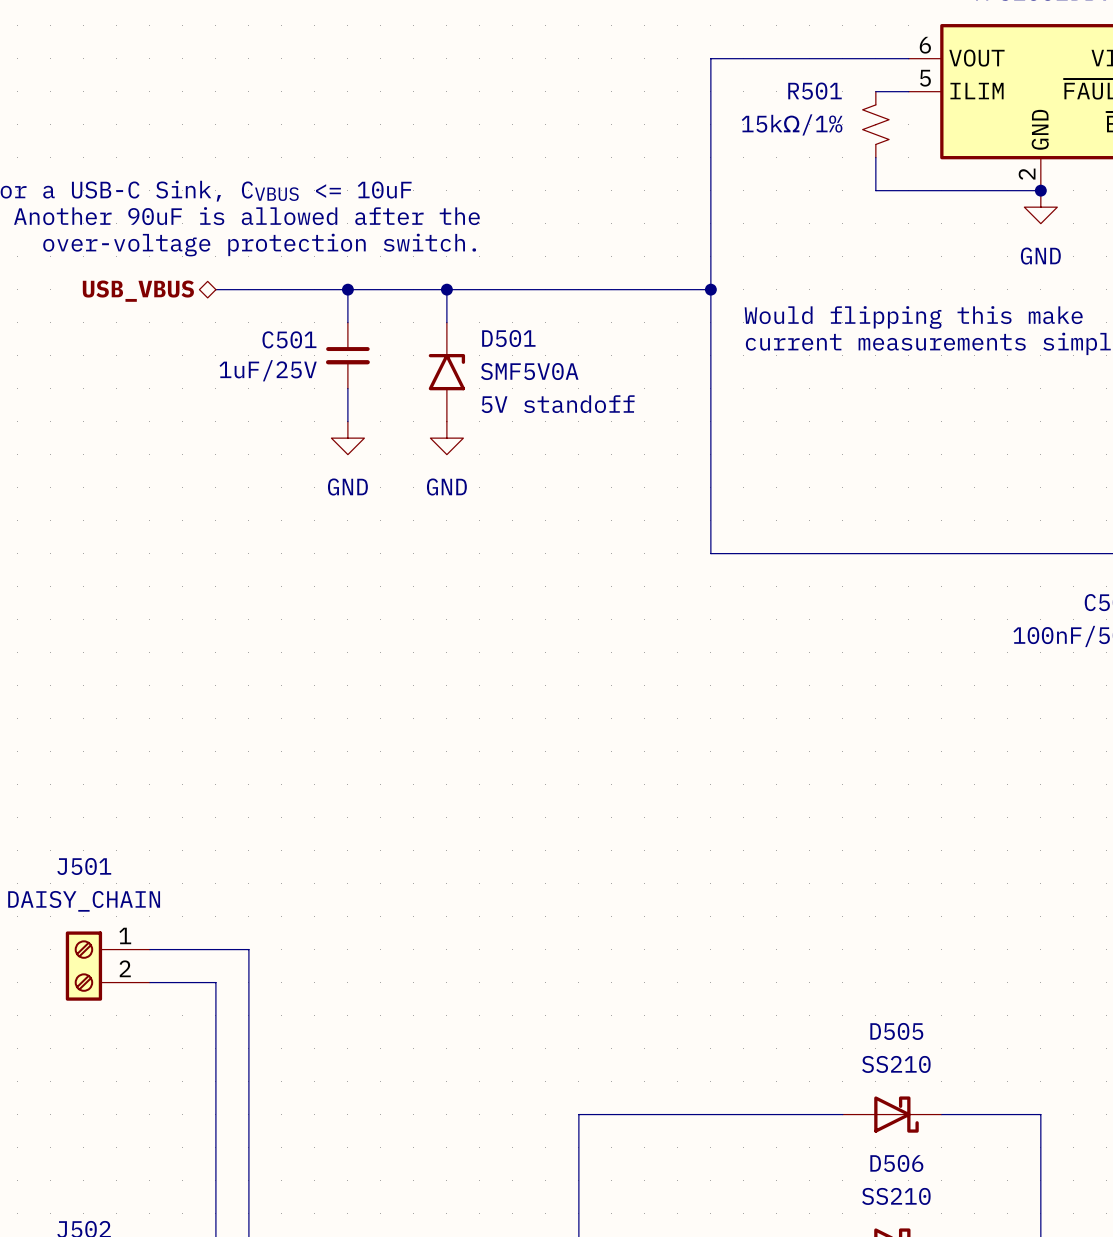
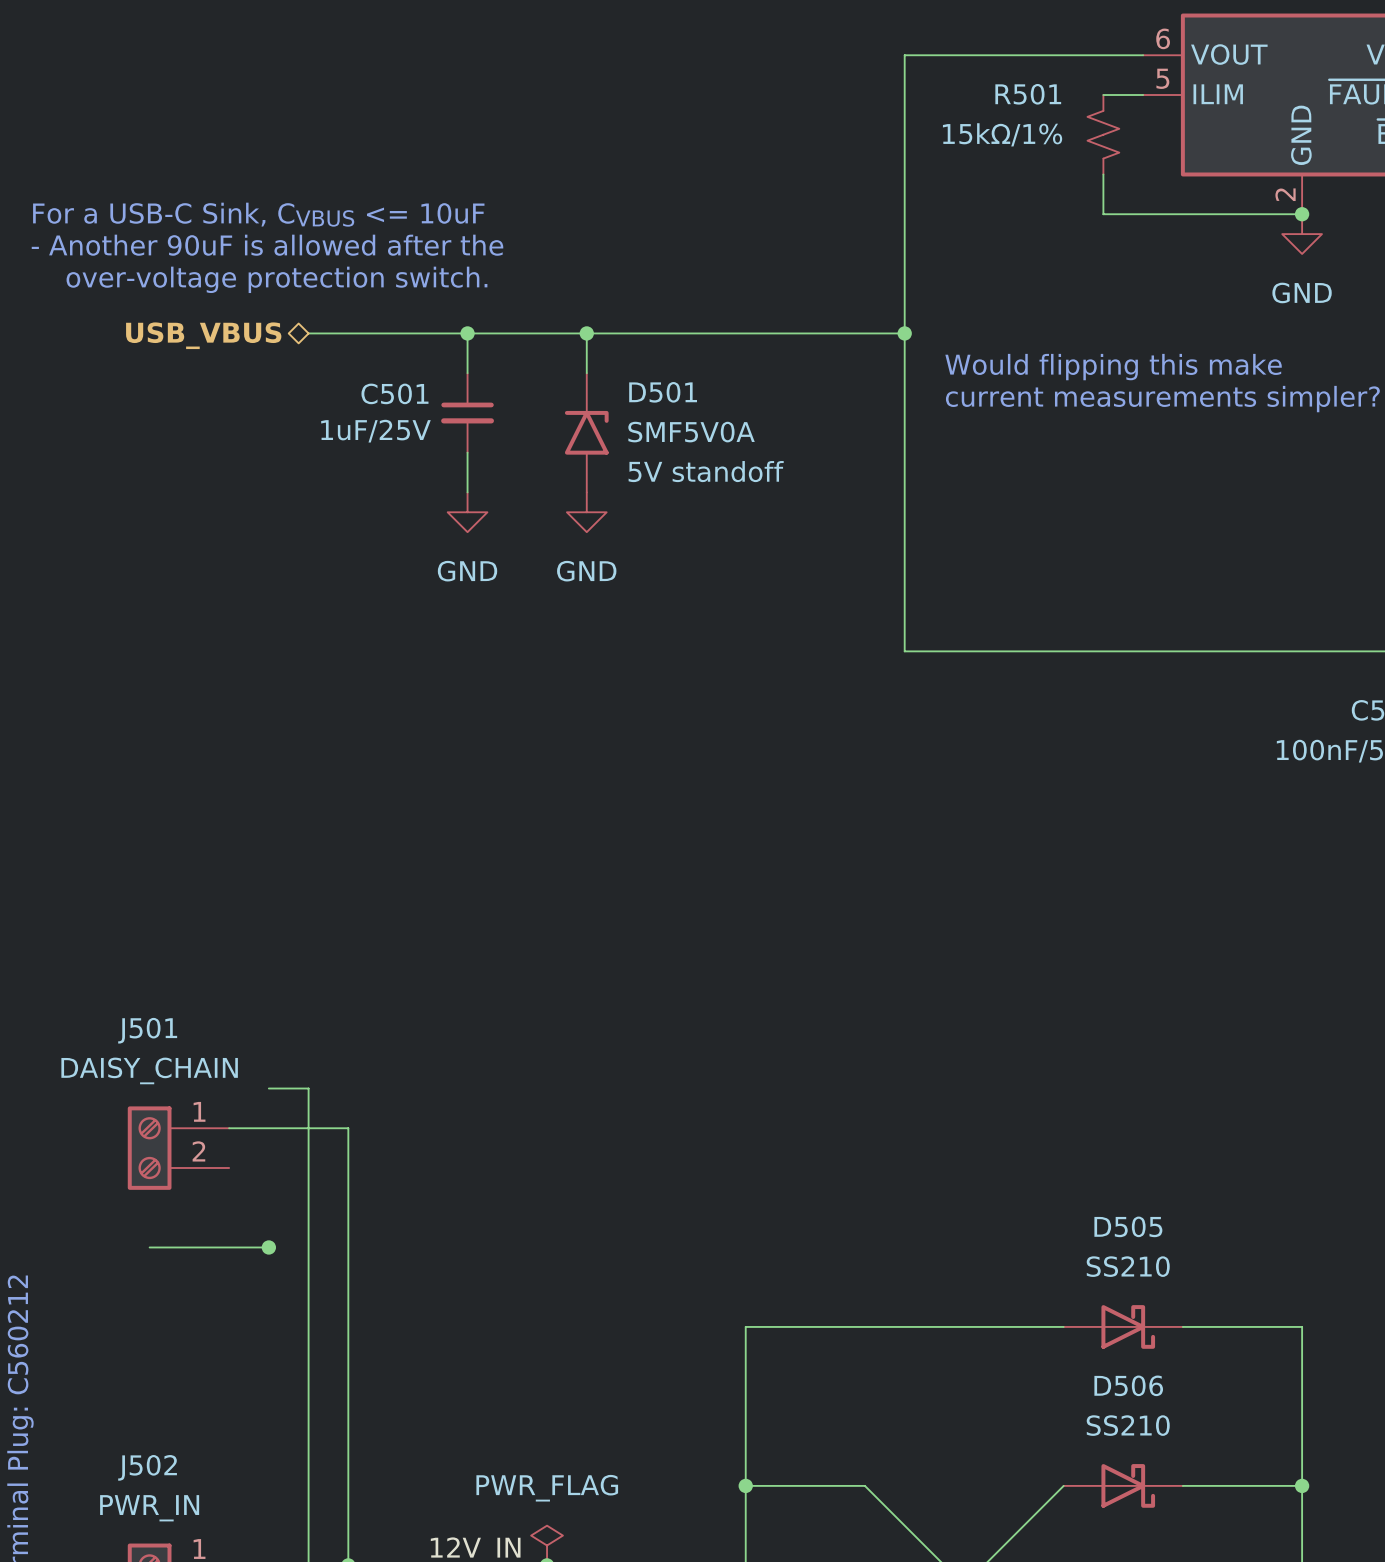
wire: (149, 982) (215, 982) -> (268, 1088) (308, 1088) (308, 1167)
wire: none -> (149, 1247) (268, 1247)
junction: none -> (268, 1247)

